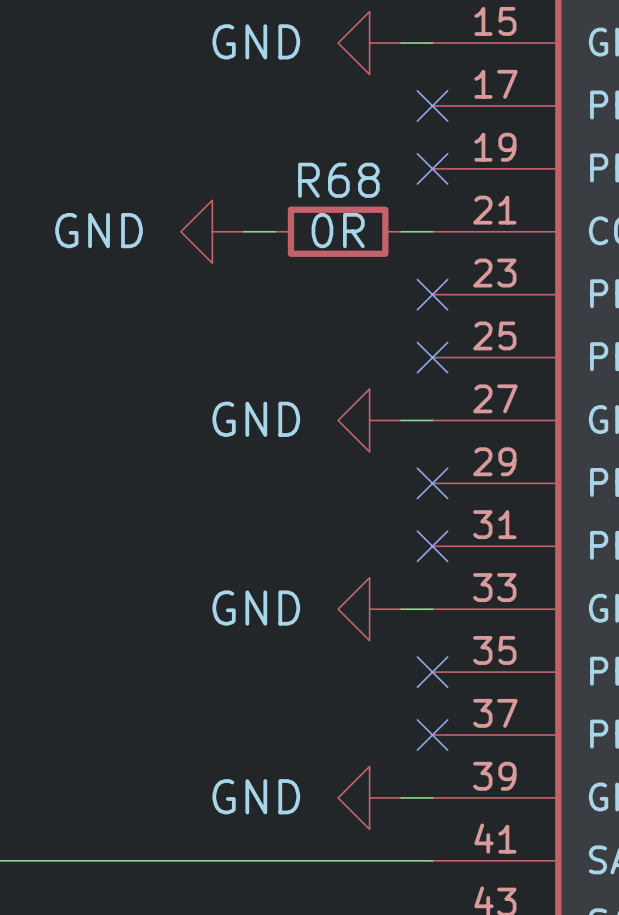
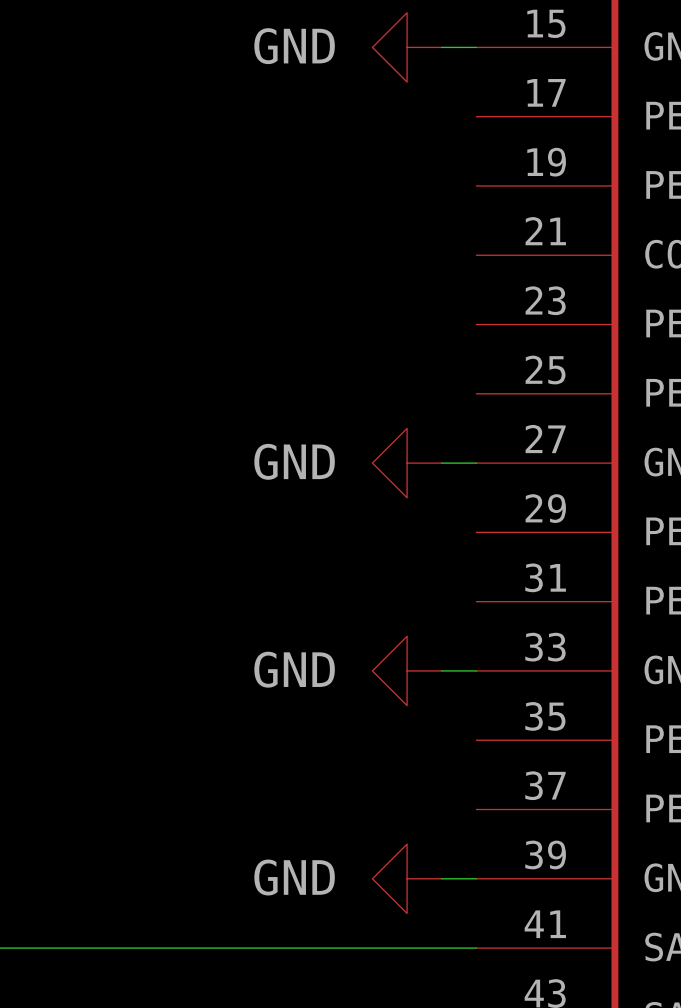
no-connect mark: (432, 105) -> none
no-connect mark: (432, 168) -> none
power symbol: GND (212, 231) -> none
wire: (243, 231) (275, 231) -> none
R68: (338, 231) -> none
wire: (401, 231) (432, 231) -> none
no-connect mark: (432, 294) -> none
no-connect mark: (432, 357) -> none
no-connect mark: (432, 483) -> none
no-connect mark: (432, 546) -> none
no-connect mark: (432, 672) -> none
no-connect mark: (432, 735) -> none

